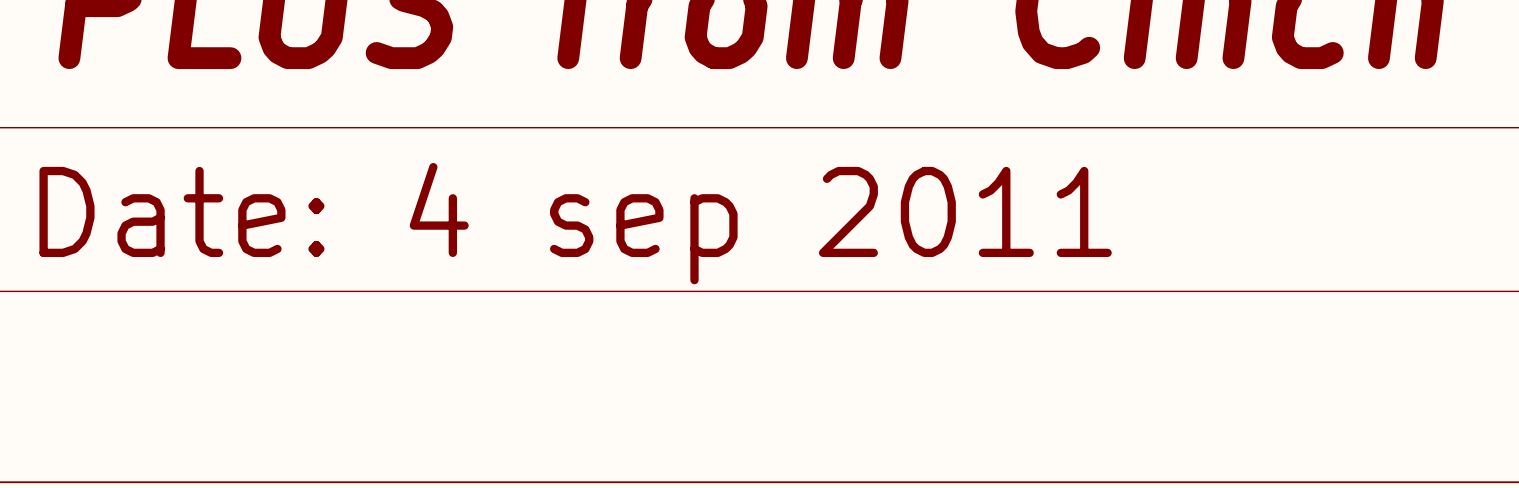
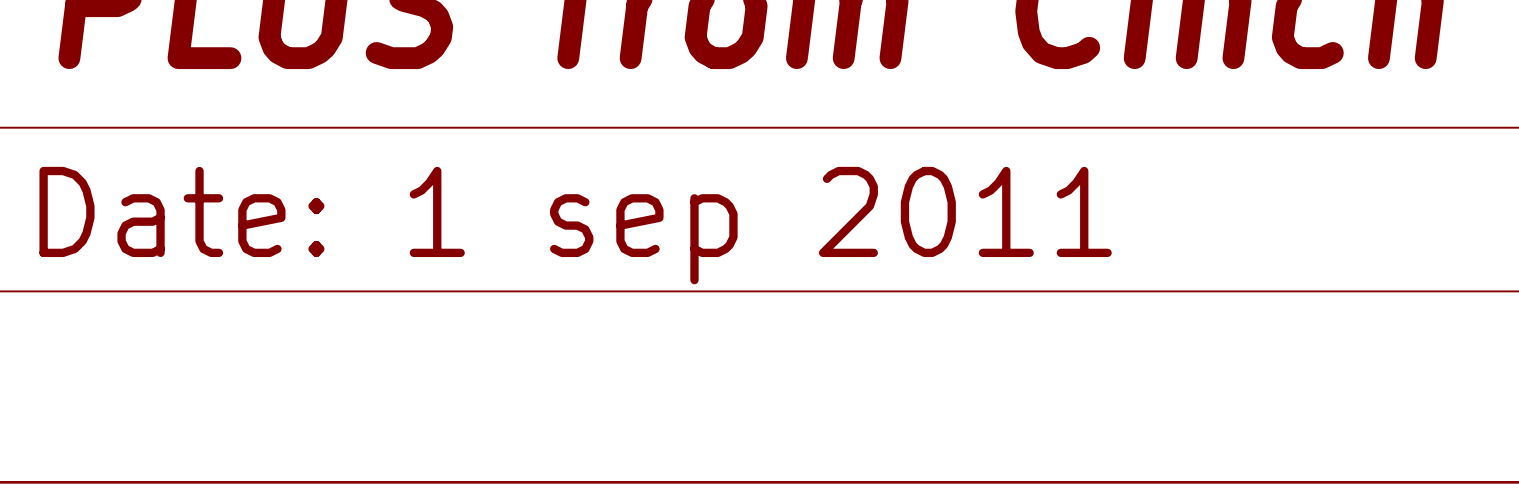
title block: Date: 4 sep 2011 (575, 223) -> Date: 1 sep 2011 (575, 225)

